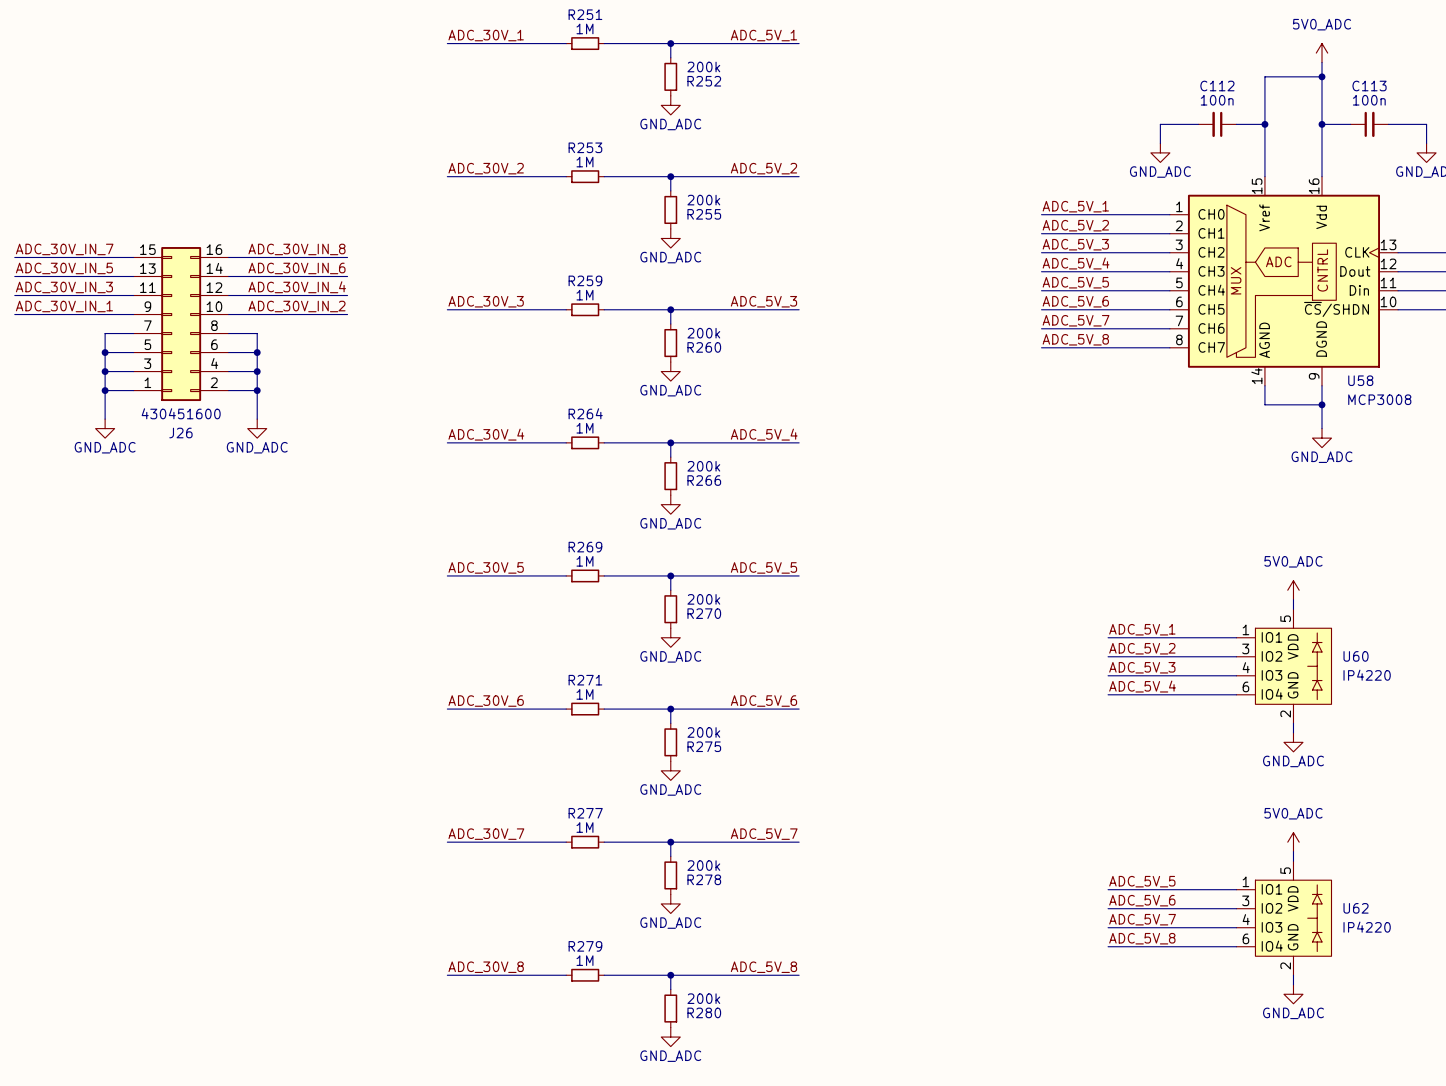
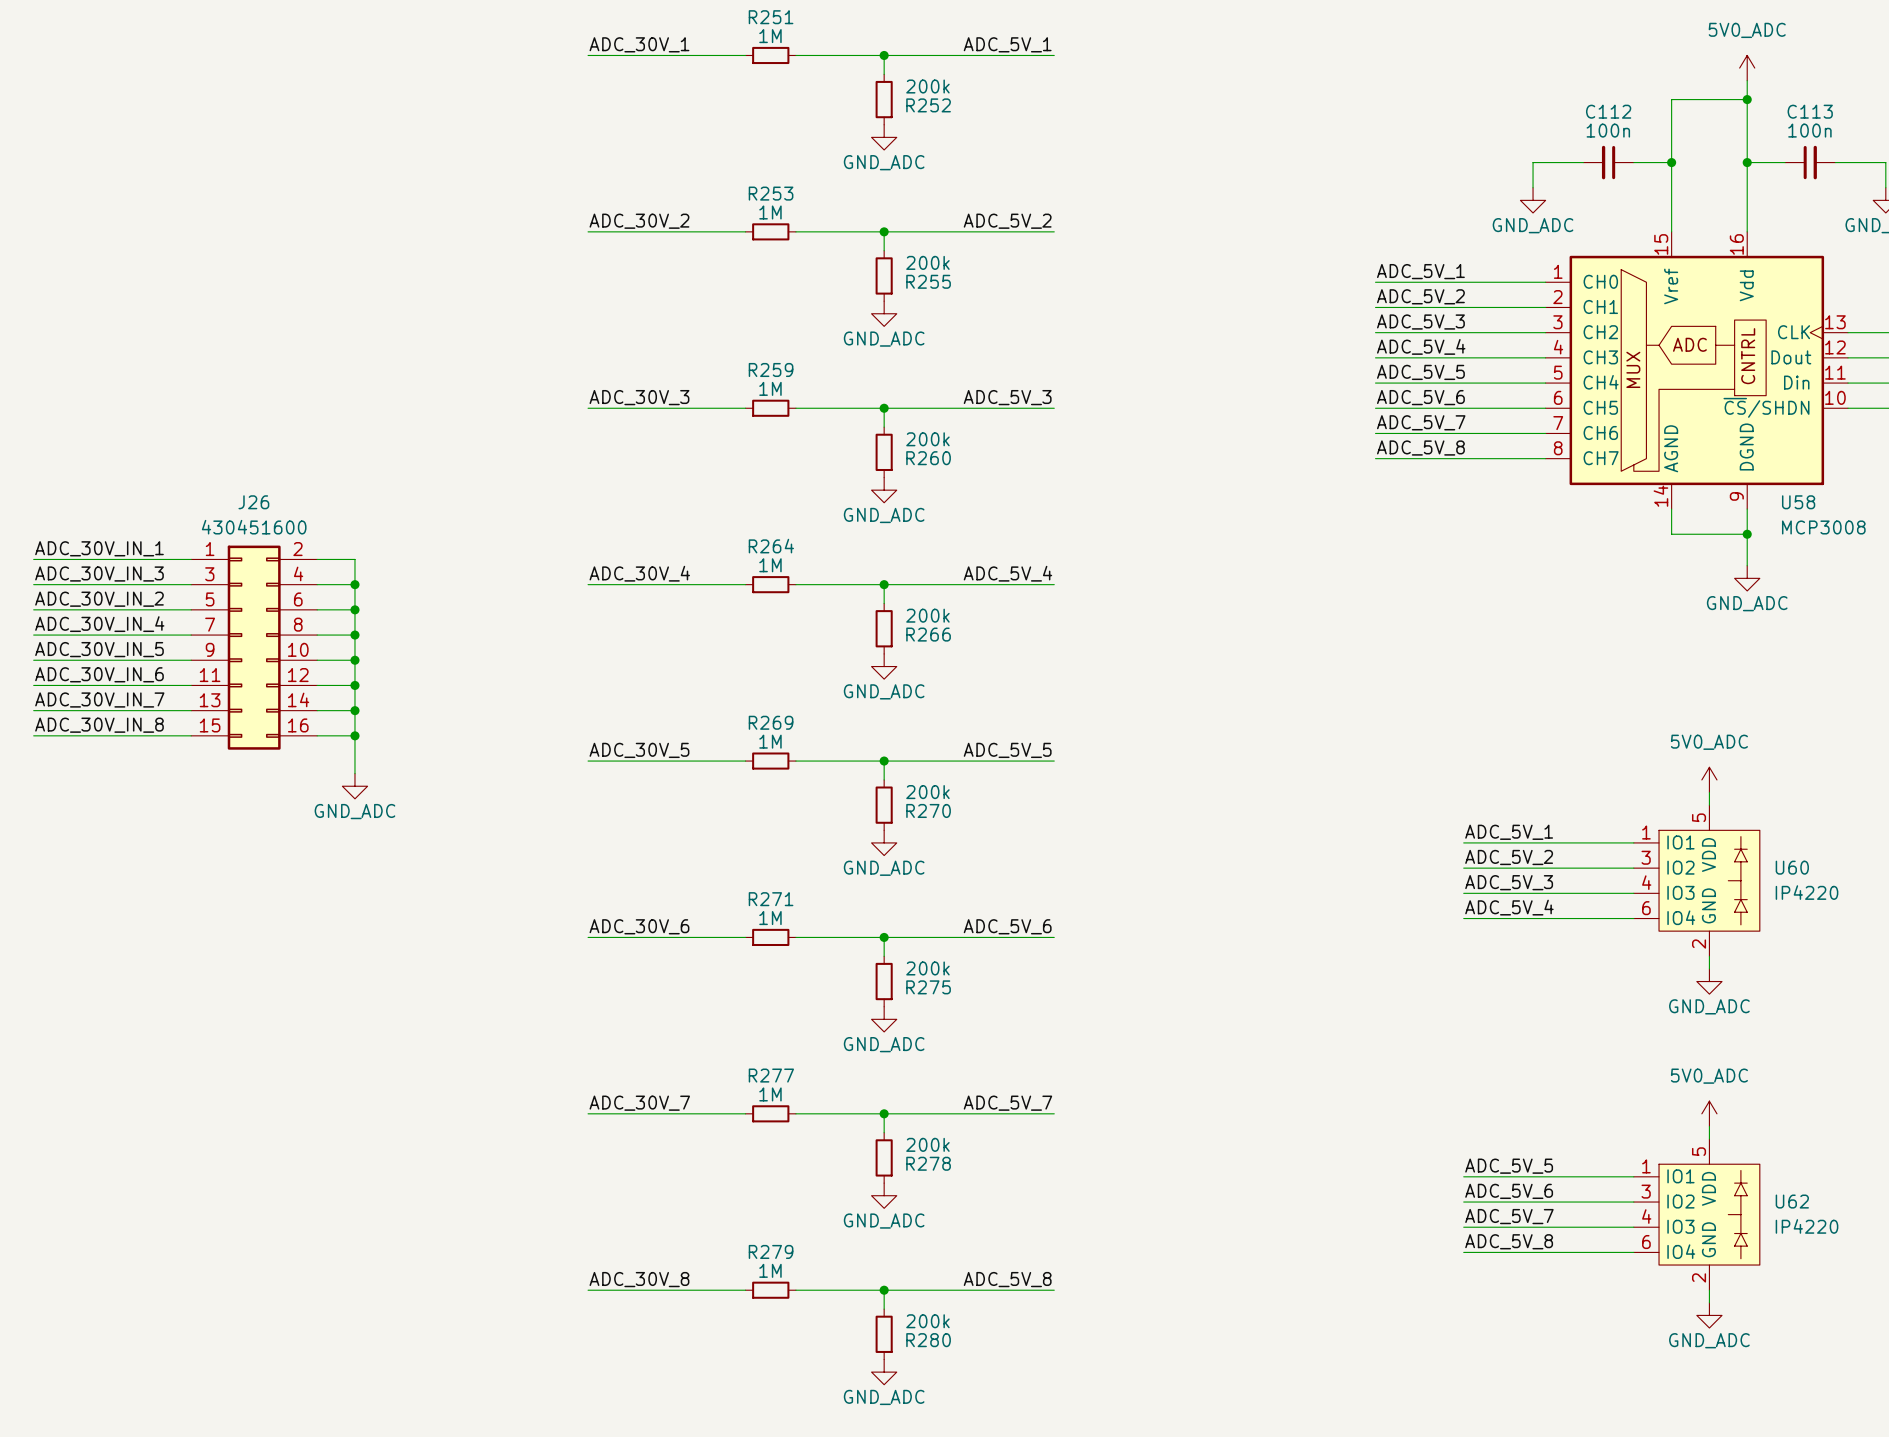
label: ADC_30V_IN_7 (64, 249) -> none
label: ADC_30V_IN_8 (296, 249) -> none
wire: (14, 257) (133, 257) -> (33, 559) (191, 559)
wire: (228, 257) (347, 257) -> none
label: ADC_30V_IN_5 (64, 268) -> none
label: ADC_30V_IN_6 (296, 268) -> none
wire: (14, 276) (133, 276) -> (33, 584) (191, 584)
wire: (228, 276) (347, 276) -> none
label position: ADC_30V_IN_3 (64, 287) -> ADC_30V_IN_3 (99, 574)
label: ADC_30V_IN_4 (297, 287) -> none
wire: (14, 295) (133, 295) -> (33, 609) (191, 609)
wire: (228, 295) (347, 295) -> none
label position: ADC_30V_IN_1 (64, 306) -> ADC_30V_IN_1 (99, 548)
label: ADC_30V_IN_2 (296, 306) -> none
wire: (14, 314) (133, 314) -> (33, 635) (191, 635)
wire: (228, 314) (347, 314) -> none
J26 flip: as is (181, 324) -> up-down (254, 647)
J26 position: (181, 324) -> (254, 647)
wire: (133, 333) (105, 333) (105, 419) -> none
wire: (228, 333) (257, 333) (257, 419) -> none
wire: (105, 352) (133, 352) -> (317, 584) (354, 584)
junction: (105, 352) -> none
wire: (228, 352) (257, 352) -> (317, 685) (354, 685)
junction: (257, 352) -> none
wire: (105, 371) (133, 371) -> (317, 609) (354, 609)
junction: (105, 371) -> none
wire: (228, 371) (257, 371) -> (317, 710) (354, 710)
junction: (257, 371) -> none
wire: (105, 390) (133, 390) -> (317, 635) (354, 635)
junction: (105, 390) -> none
wire: (228, 390) (257, 390) -> (317, 735) (354, 735)
junction: (257, 390) -> none
wire: none -> (317, 559) (354, 559) (354, 773)
power symbol: GND_ADC (105, 428) -> none
power symbol: GND_ADC (257, 428) -> none
junction: none -> (354, 584)
label: none -> ADC_30V_IN_2 (99, 599)
junction: none -> (354, 609)
label: none -> ADC_30V_IN_4 (99, 624)
junction: none -> (354, 635)
label: none -> ADC_30V_IN_5 (99, 649)
wire: none -> (33, 660) (191, 660)
wire: none -> (317, 660) (354, 660)
junction: none -> (354, 660)
label: none -> ADC_30V_IN_6 (99, 674)
wire: none -> (33, 685) (191, 685)
junction: none -> (354, 685)
label: none -> ADC_30V_IN_7 (99, 700)
wire: none -> (33, 710) (191, 710)
junction: none -> (354, 710)
label: none -> ADC_30V_IN_8 (99, 725)
wire: none -> (33, 735) (191, 735)
junction: none -> (354, 735)
power symbol: none -> GND_ADC (354, 786)

